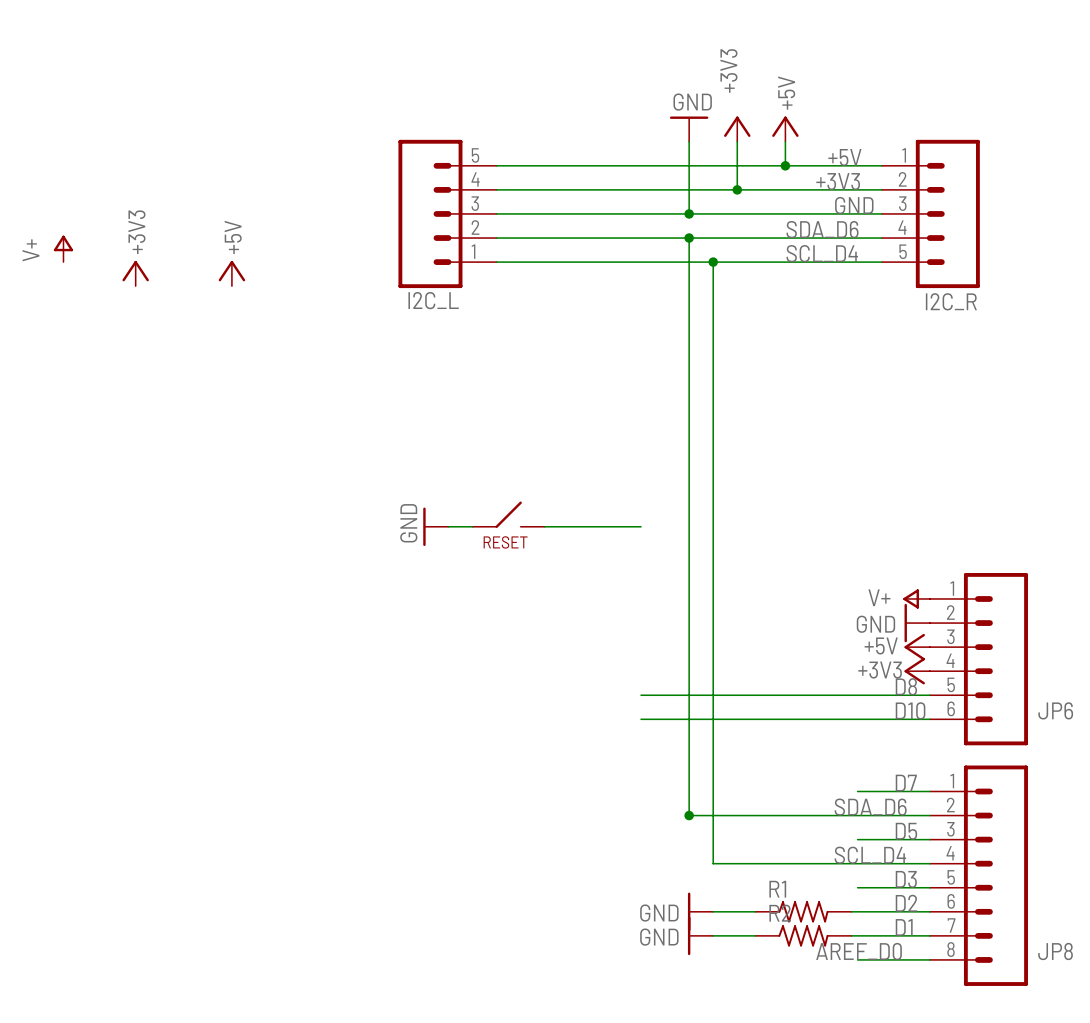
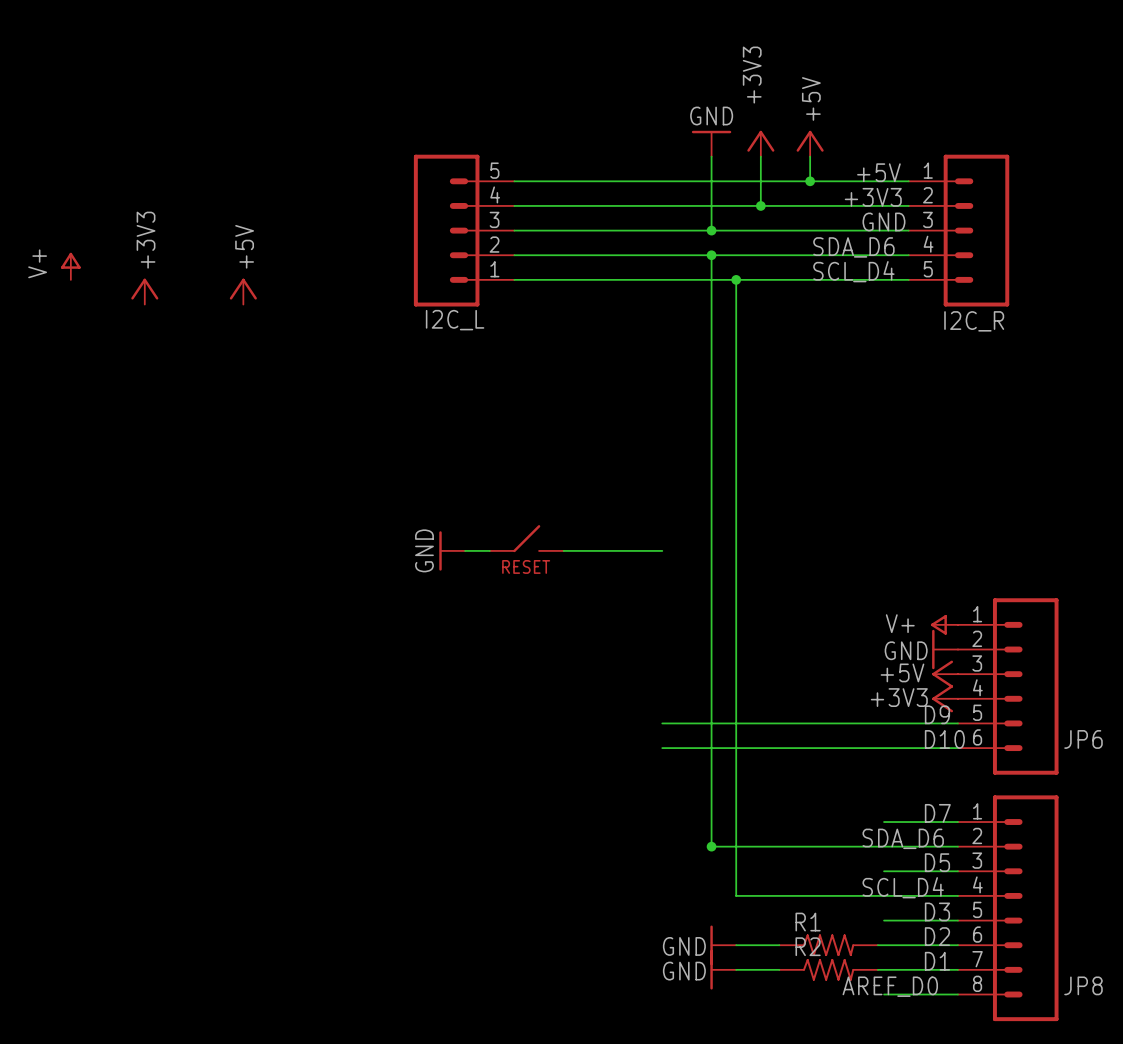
label: D8 (906, 686) -> D9 (937, 714)

